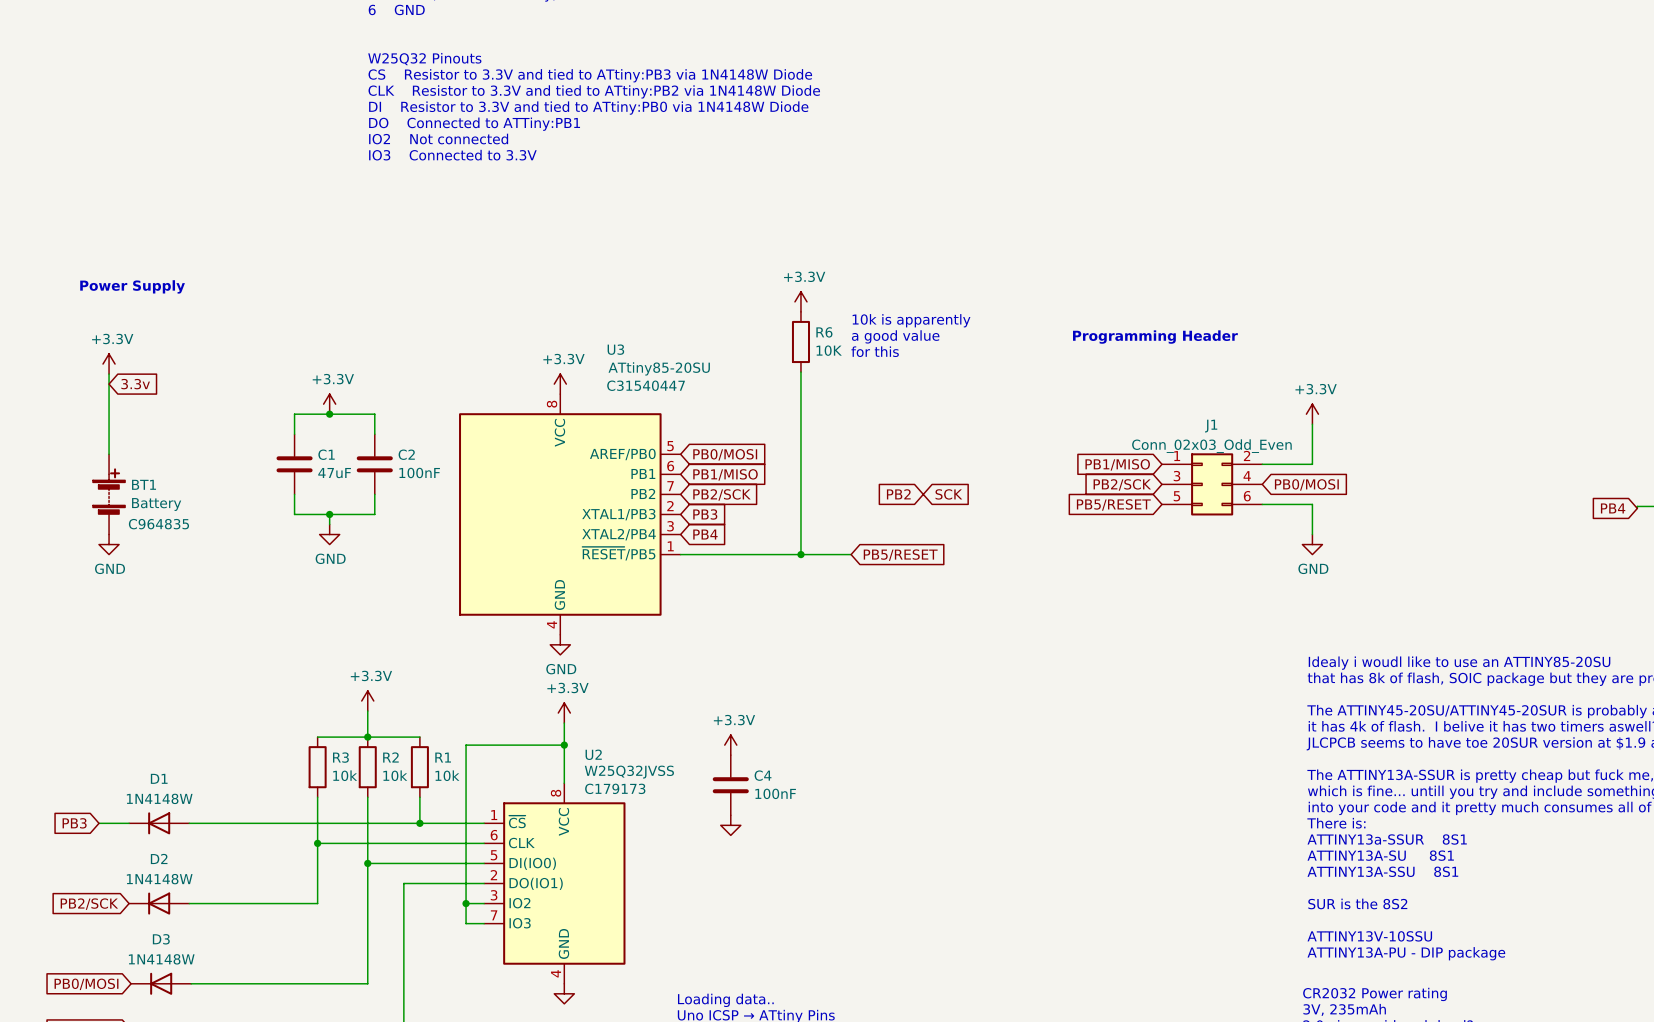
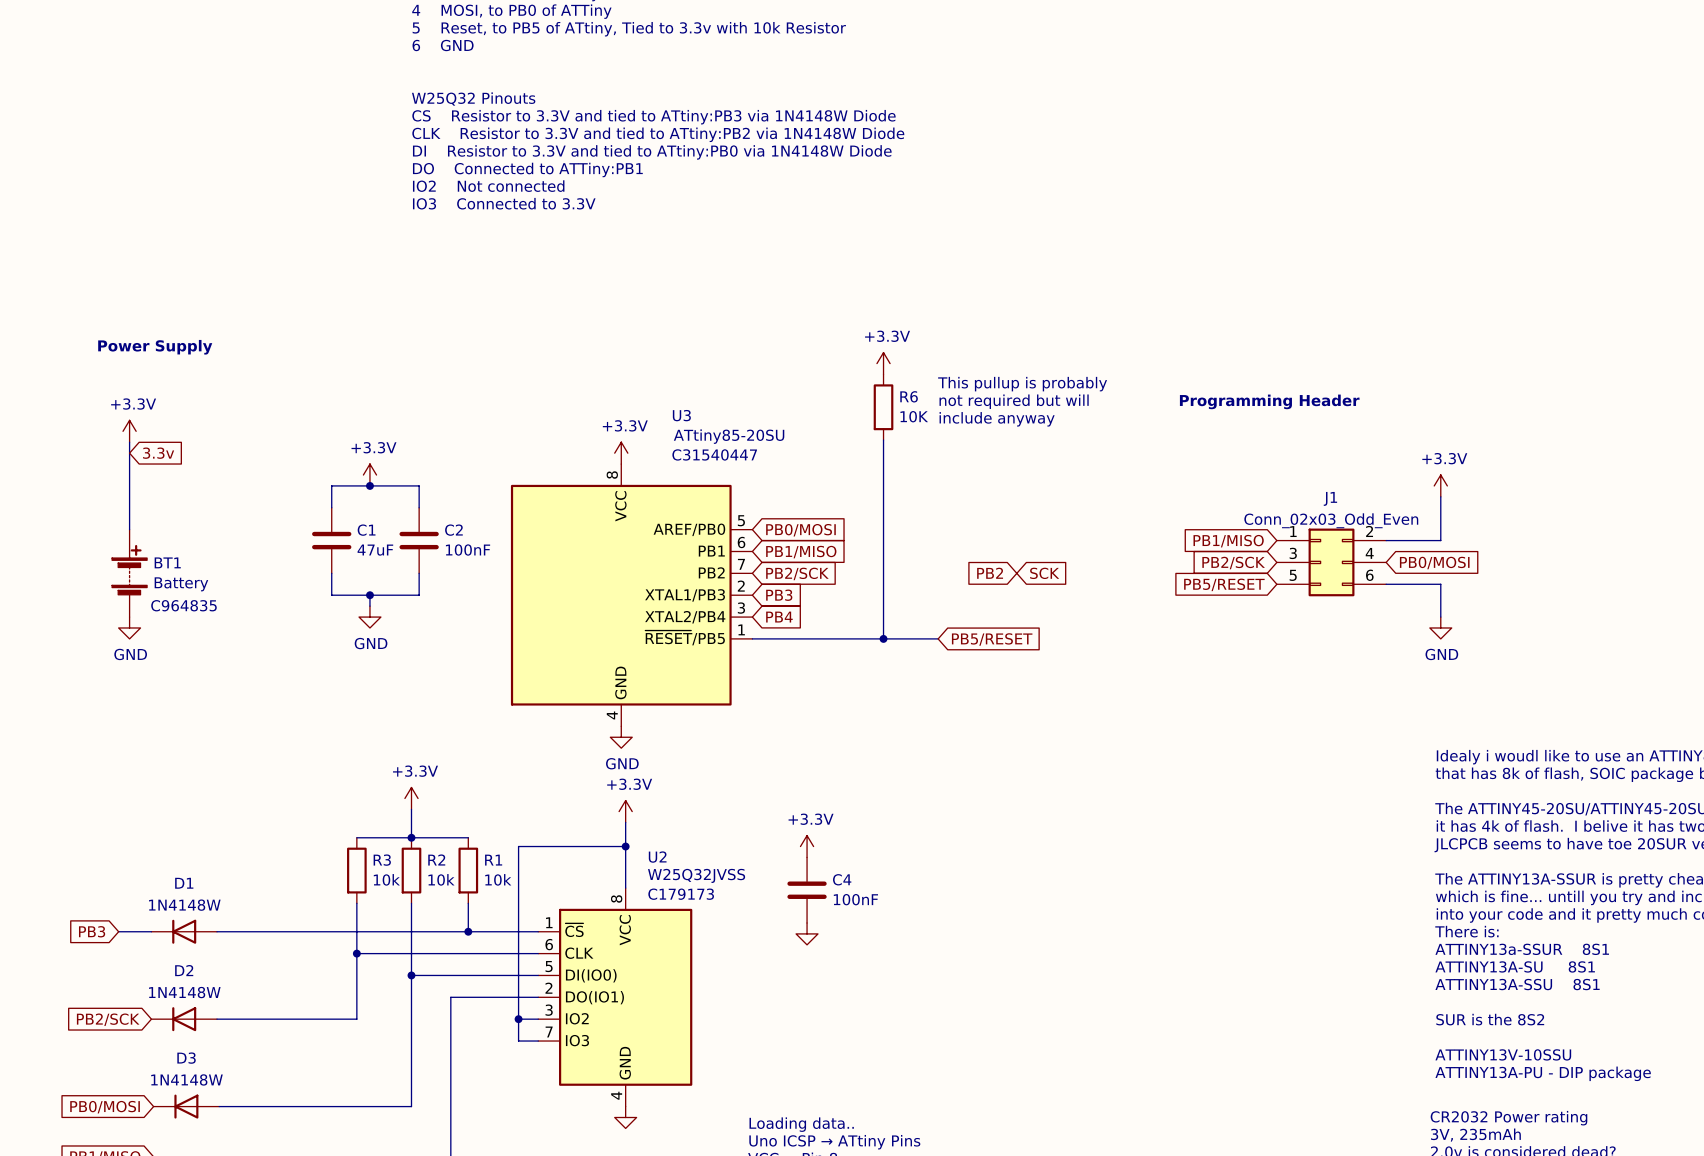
text: 10k is apparently (911, 320) -> This pullup is probably (1022, 384)
text: a good value (895, 336) -> not required but will (1014, 401)
text: for this (875, 351) -> include anyway (997, 419)

